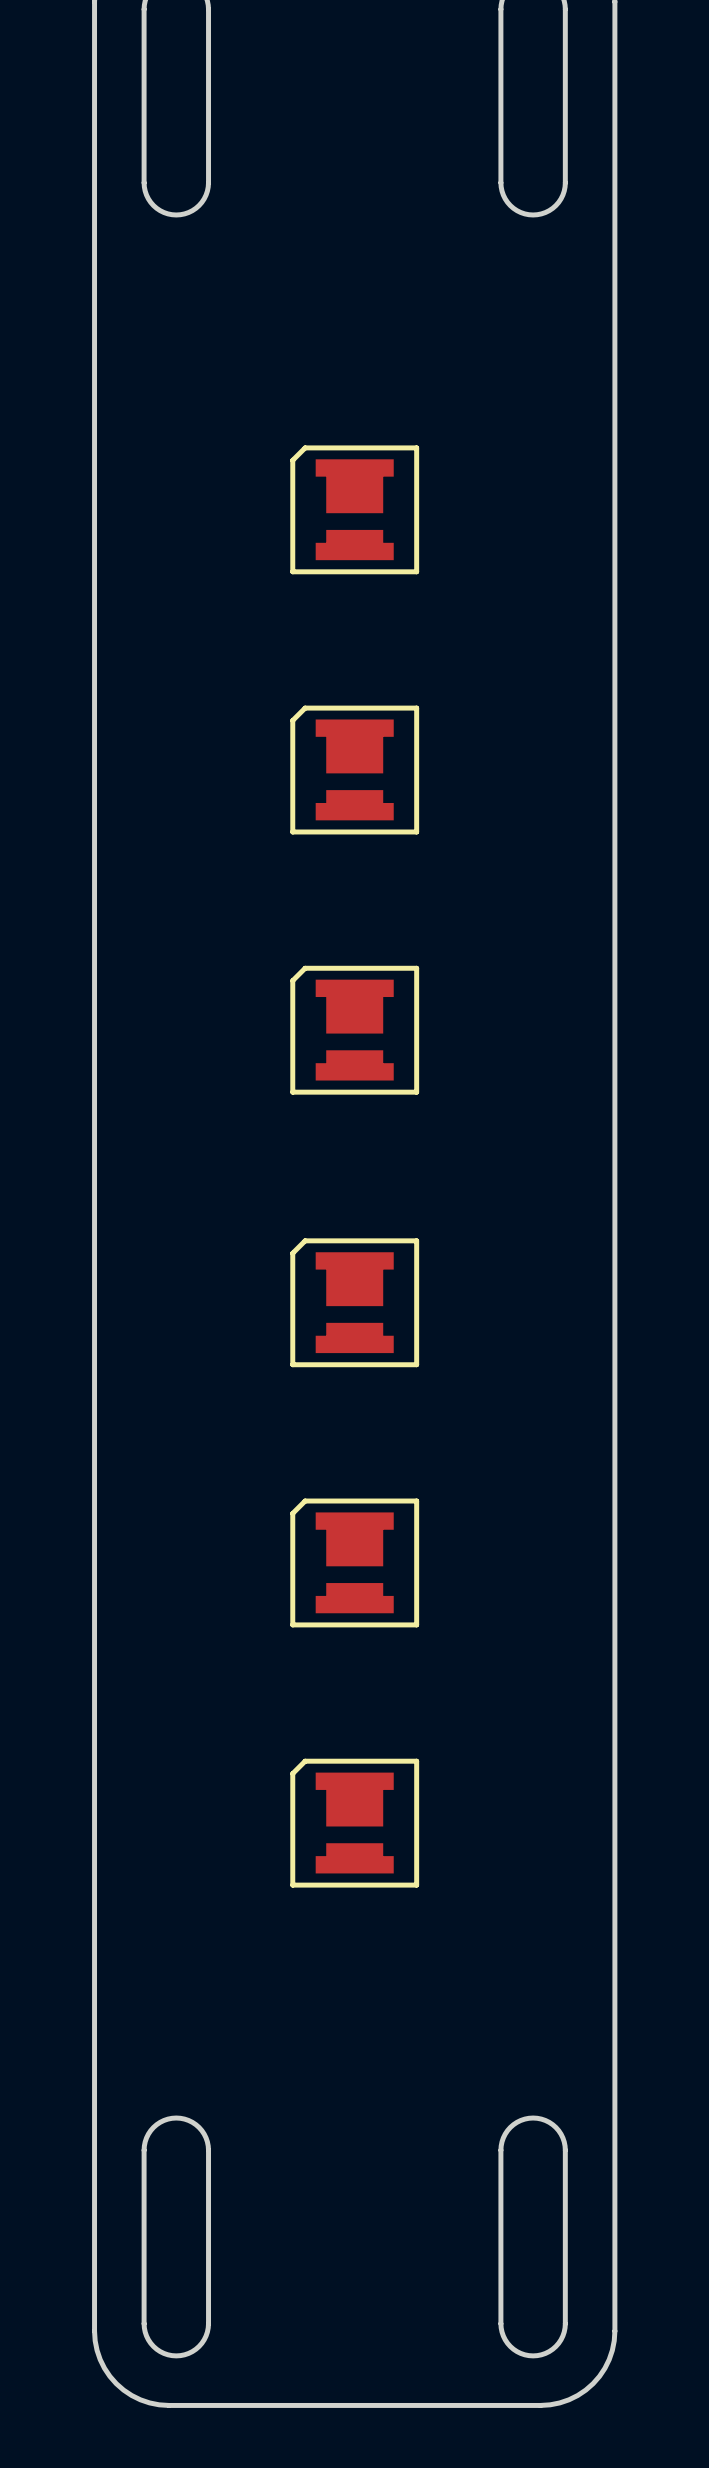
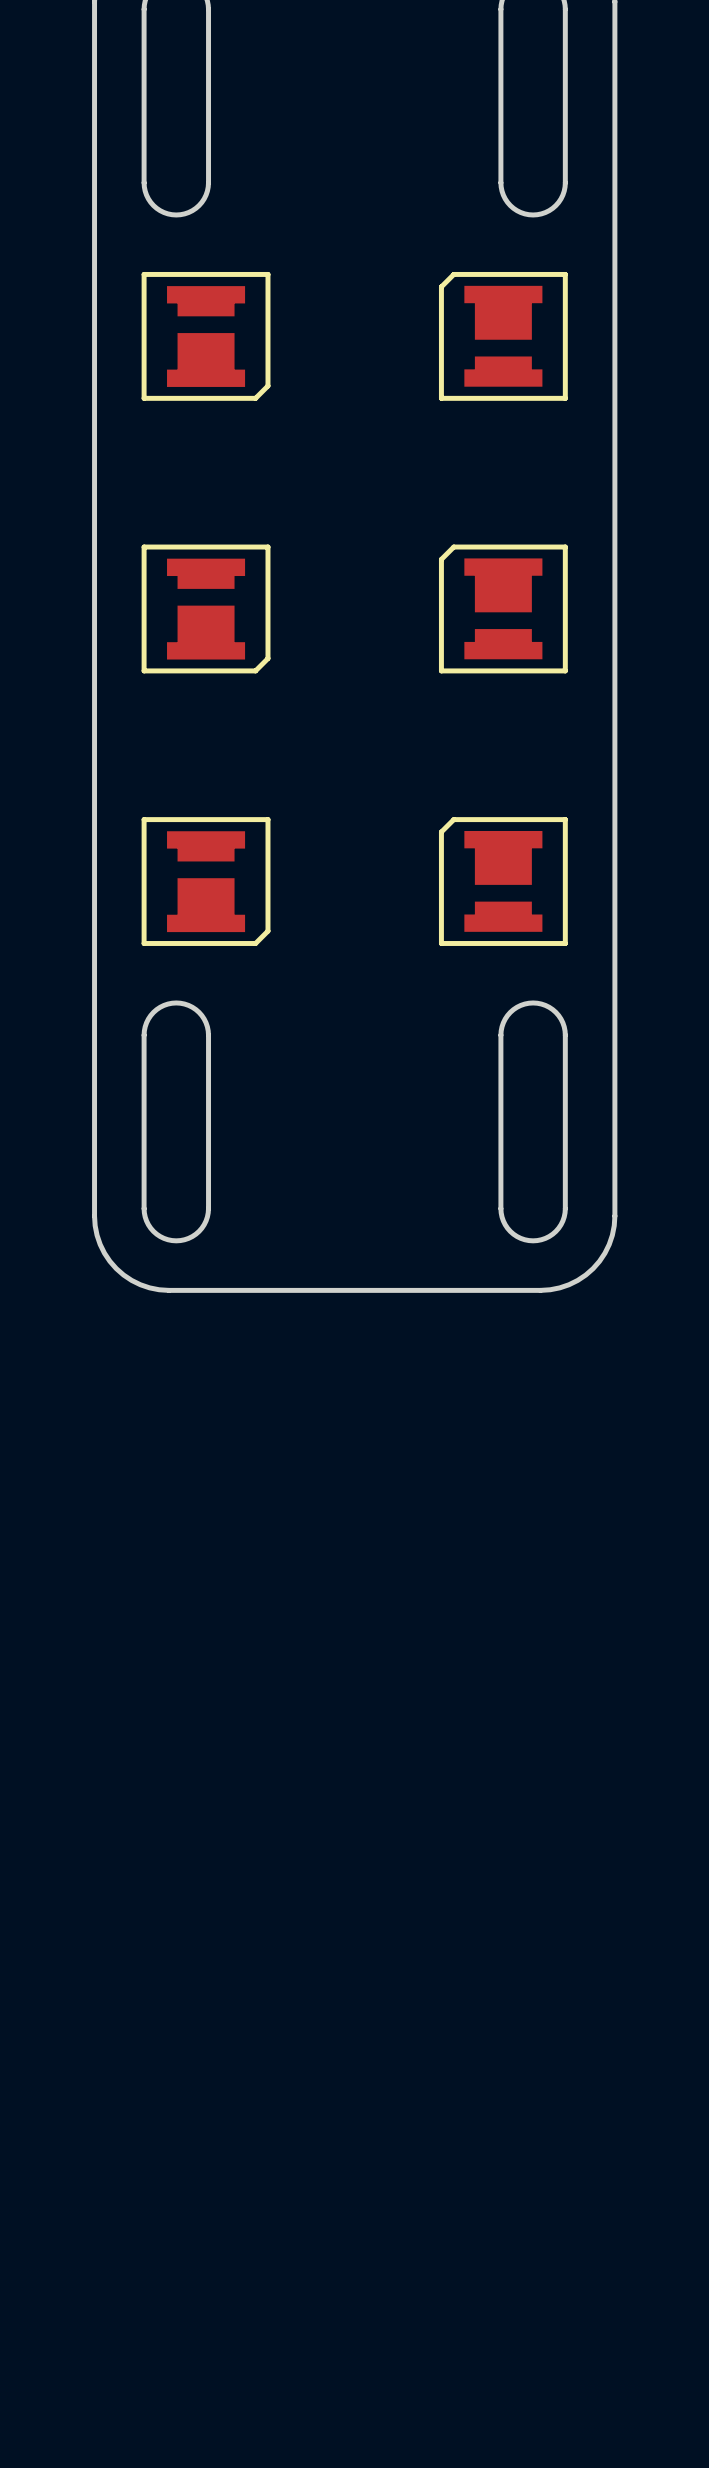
part: none -> (206, 336)
part: none -> (503, 336)
part: (354, 509) -> none
part: none -> (206, 608)
part: none -> (503, 608)
part: (354, 770) -> none
part: none -> (206, 881)
part: none -> (503, 881)
part: (354, 1030) -> none
board edge: none -> (144, 1035) (144, 1212) (148, 1224) (156, 1234) (167, 1239) (180, 1240) (192, 1236) (199, 1231) (204, 1224) (208, 1212) (208, 1030) (204, 1019) (195, 1009) (184, 1004) (172, 1003) (160, 1007) (153, 1012) (146, 1022) (144, 1035)
board edge: none -> (500, 1035) (501, 1212) (505, 1224) (513, 1234) (524, 1239) (537, 1240) (549, 1236) (555, 1231) (561, 1224) (565, 1212) (565, 1030) (561, 1019) (552, 1009) (541, 1004) (528, 1003) (517, 1007) (510, 1012) (503, 1022) (500, 1035)
board edge: (94, 1216) (94, 2331) (100, 2359) (116, 2383) (140, 2399) (168, 2405) (550, 2404) (569, 2399) (585, 2390) (599, 2376) (609, 2359) (614, 2331) (614, 1216) -> (94, 1216) (100, 1244) (116, 1268) (140, 1284) (168, 1290) (550, 1289) (569, 1284) (593, 1268) (609, 1244) (614, 1216)
part: (354, 1302) -> none
part: (354, 1562) -> none
part: (354, 1823) -> none
board edge: (144, 2150) (144, 2327) (148, 2339) (156, 2349) (167, 2354) (180, 2355) (188, 2353) (199, 2346) (204, 2339) (208, 2327) (208, 2146) (204, 2134) (199, 2127) (188, 2120) (176, 2118) (163, 2120) (153, 2127) (146, 2137) (144, 2150) -> none
board edge: (500, 2150) (501, 2327) (505, 2339) (513, 2349) (524, 2354) (537, 2355) (545, 2353) (555, 2346) (561, 2339) (565, 2327) (565, 2146) (561, 2134) (552, 2124) (541, 2119) (528, 2118) (517, 2122) (510, 2127) (503, 2137) (500, 2150) -> none

